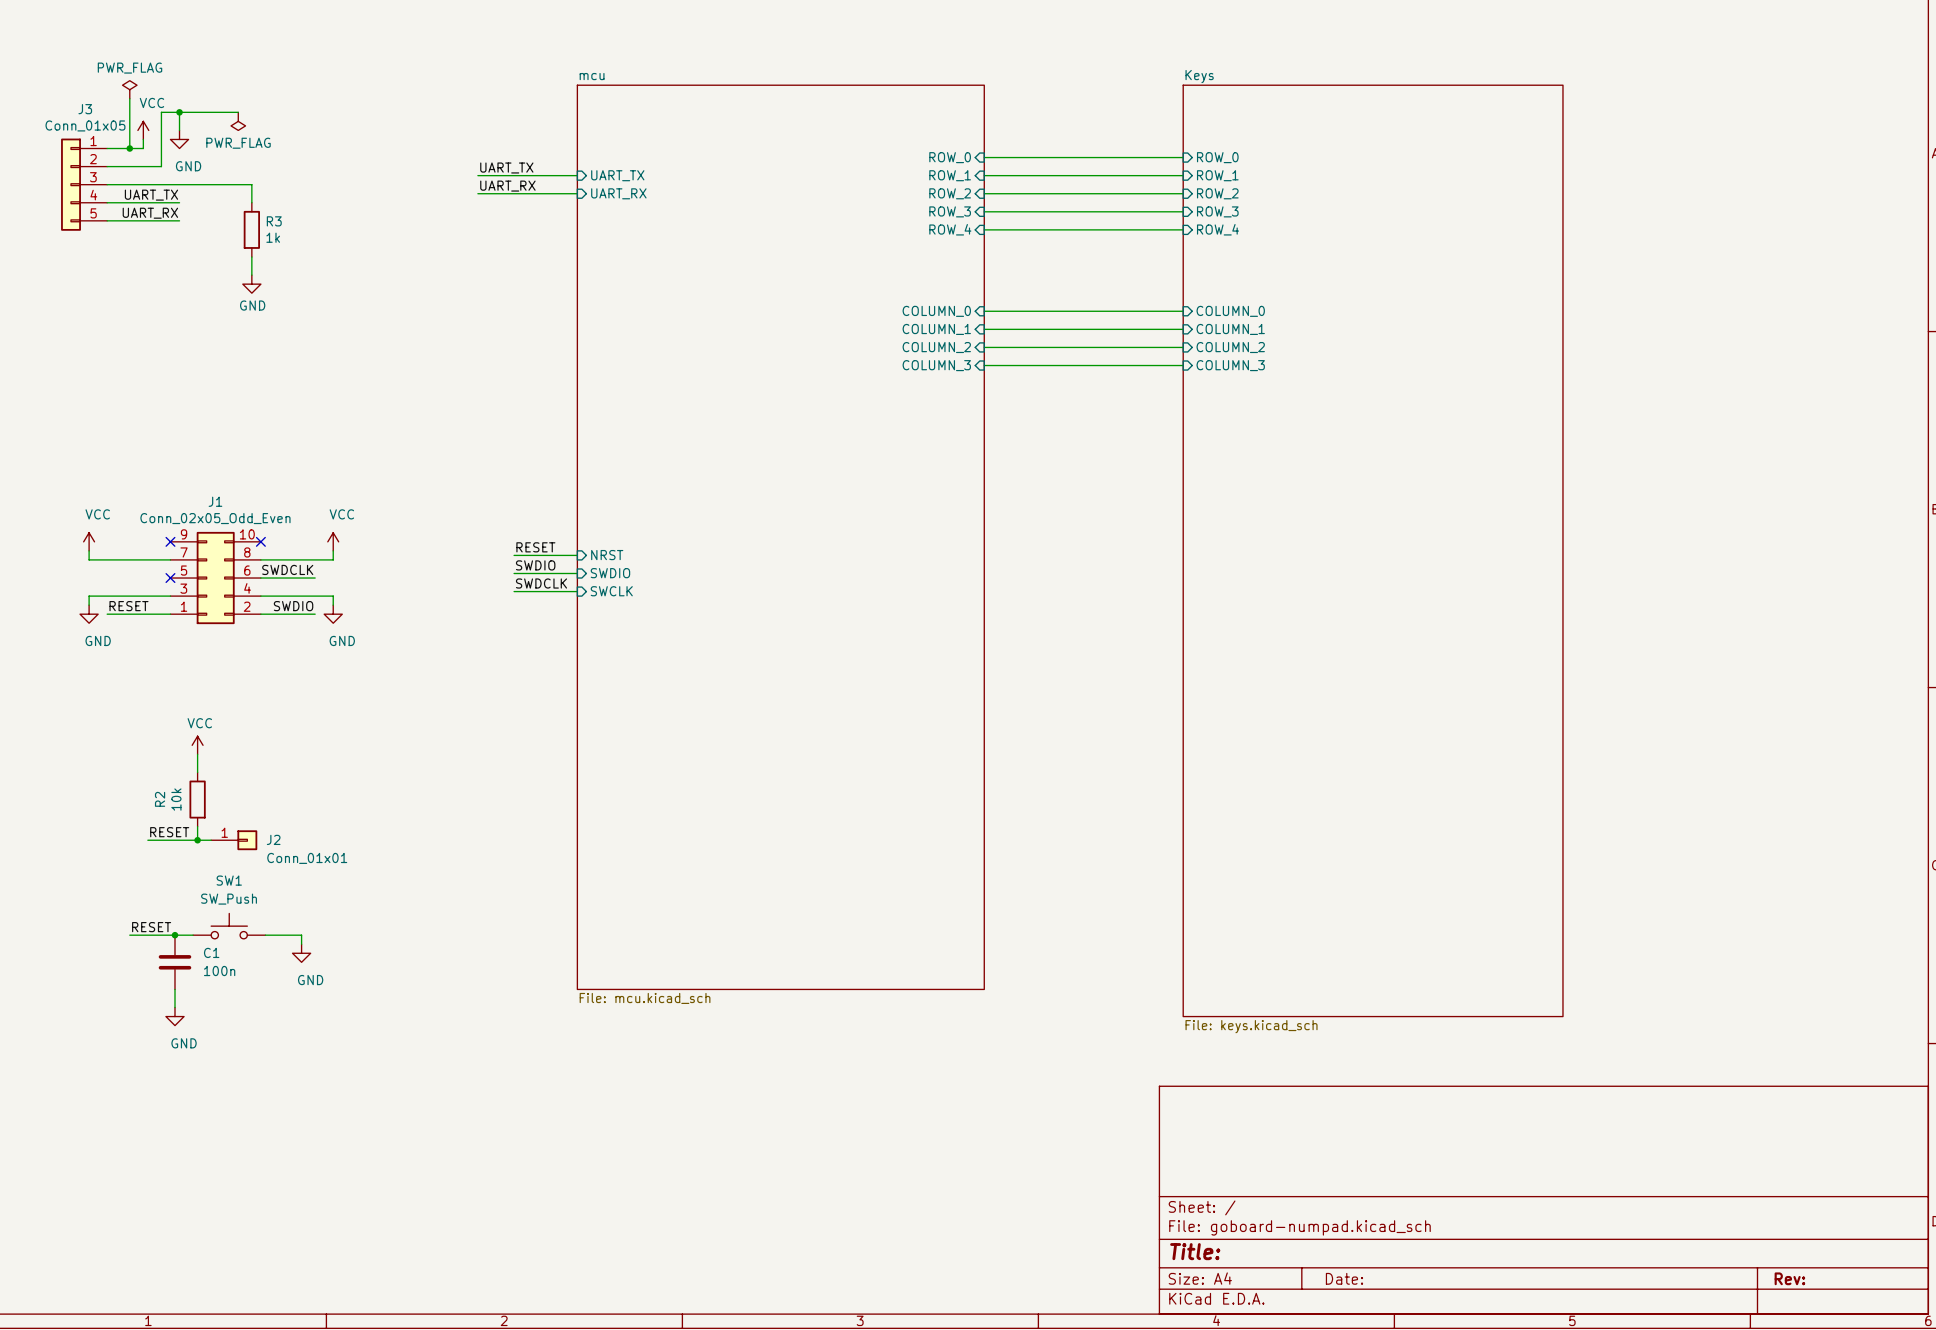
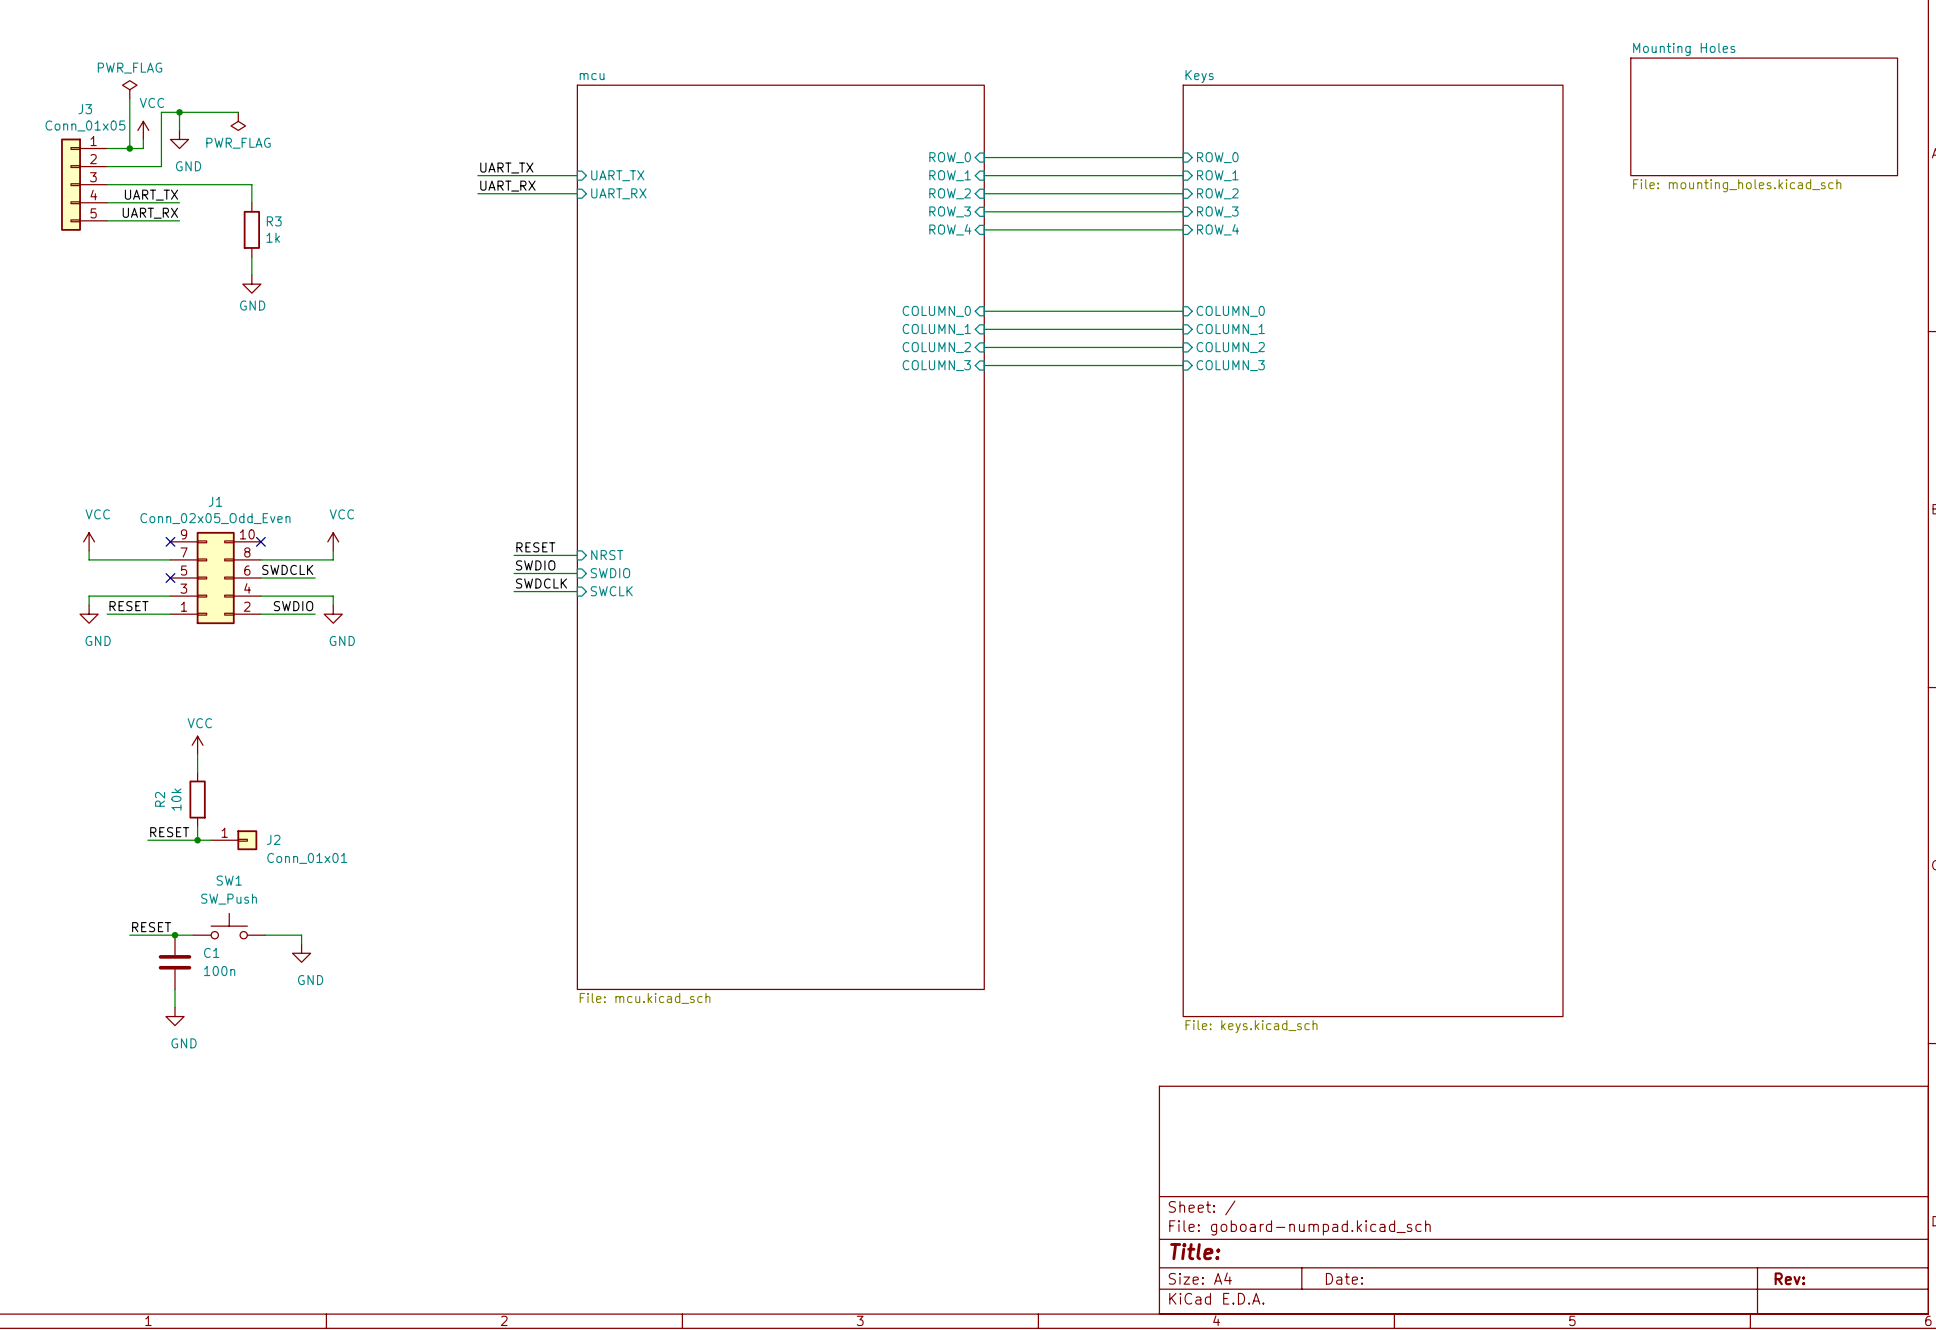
sheet Mounting Holes: none -> File: mounting_holes.kicad_sch (1764, 116)

